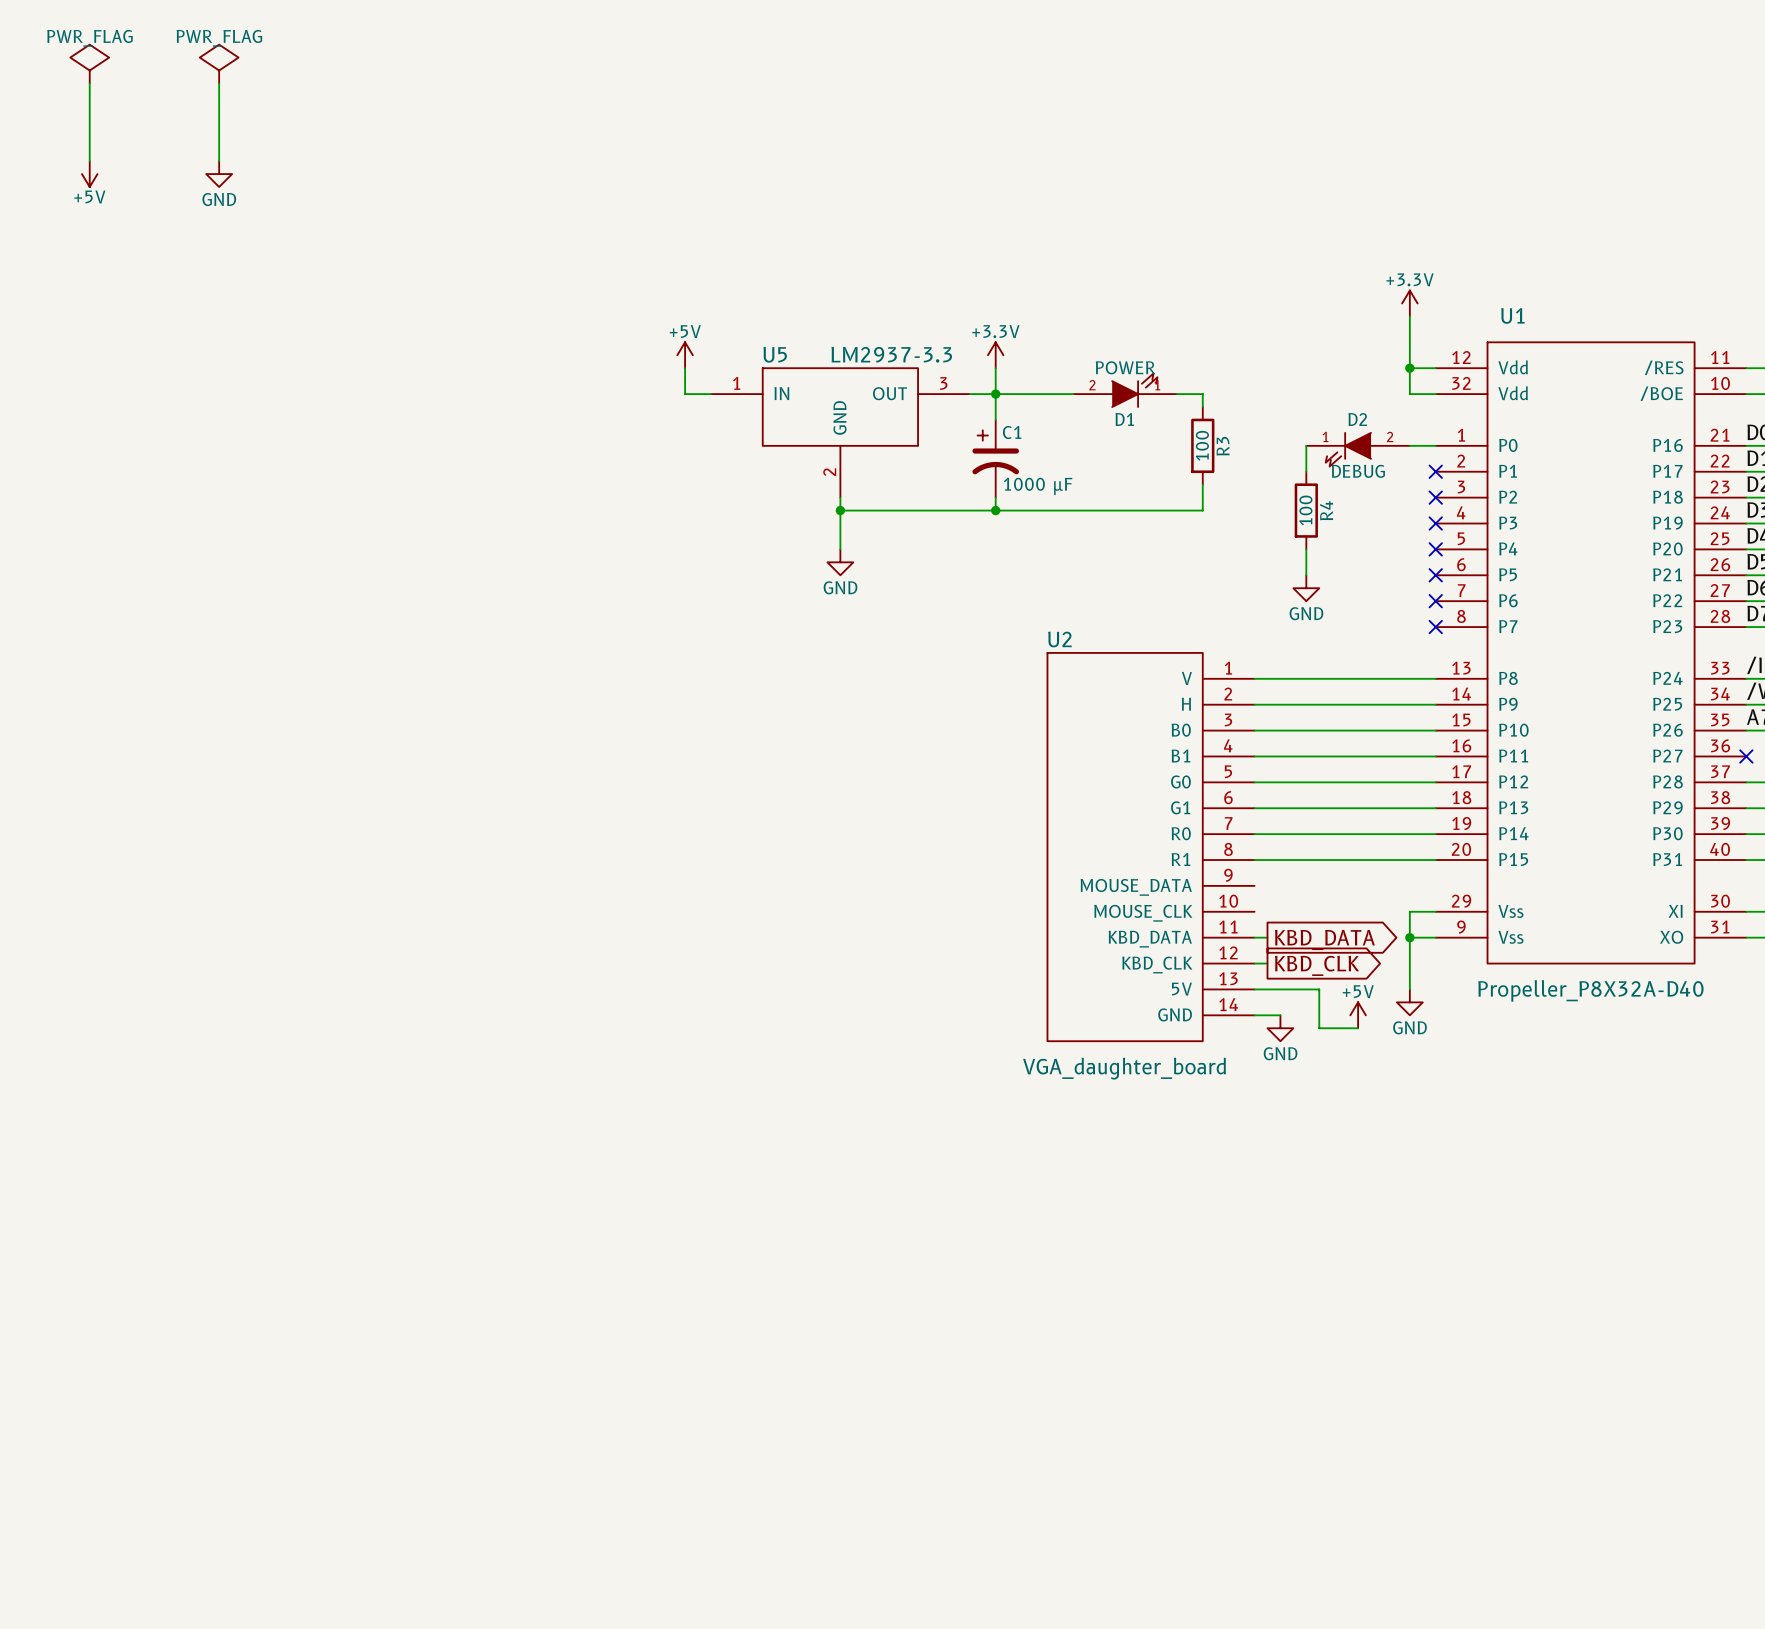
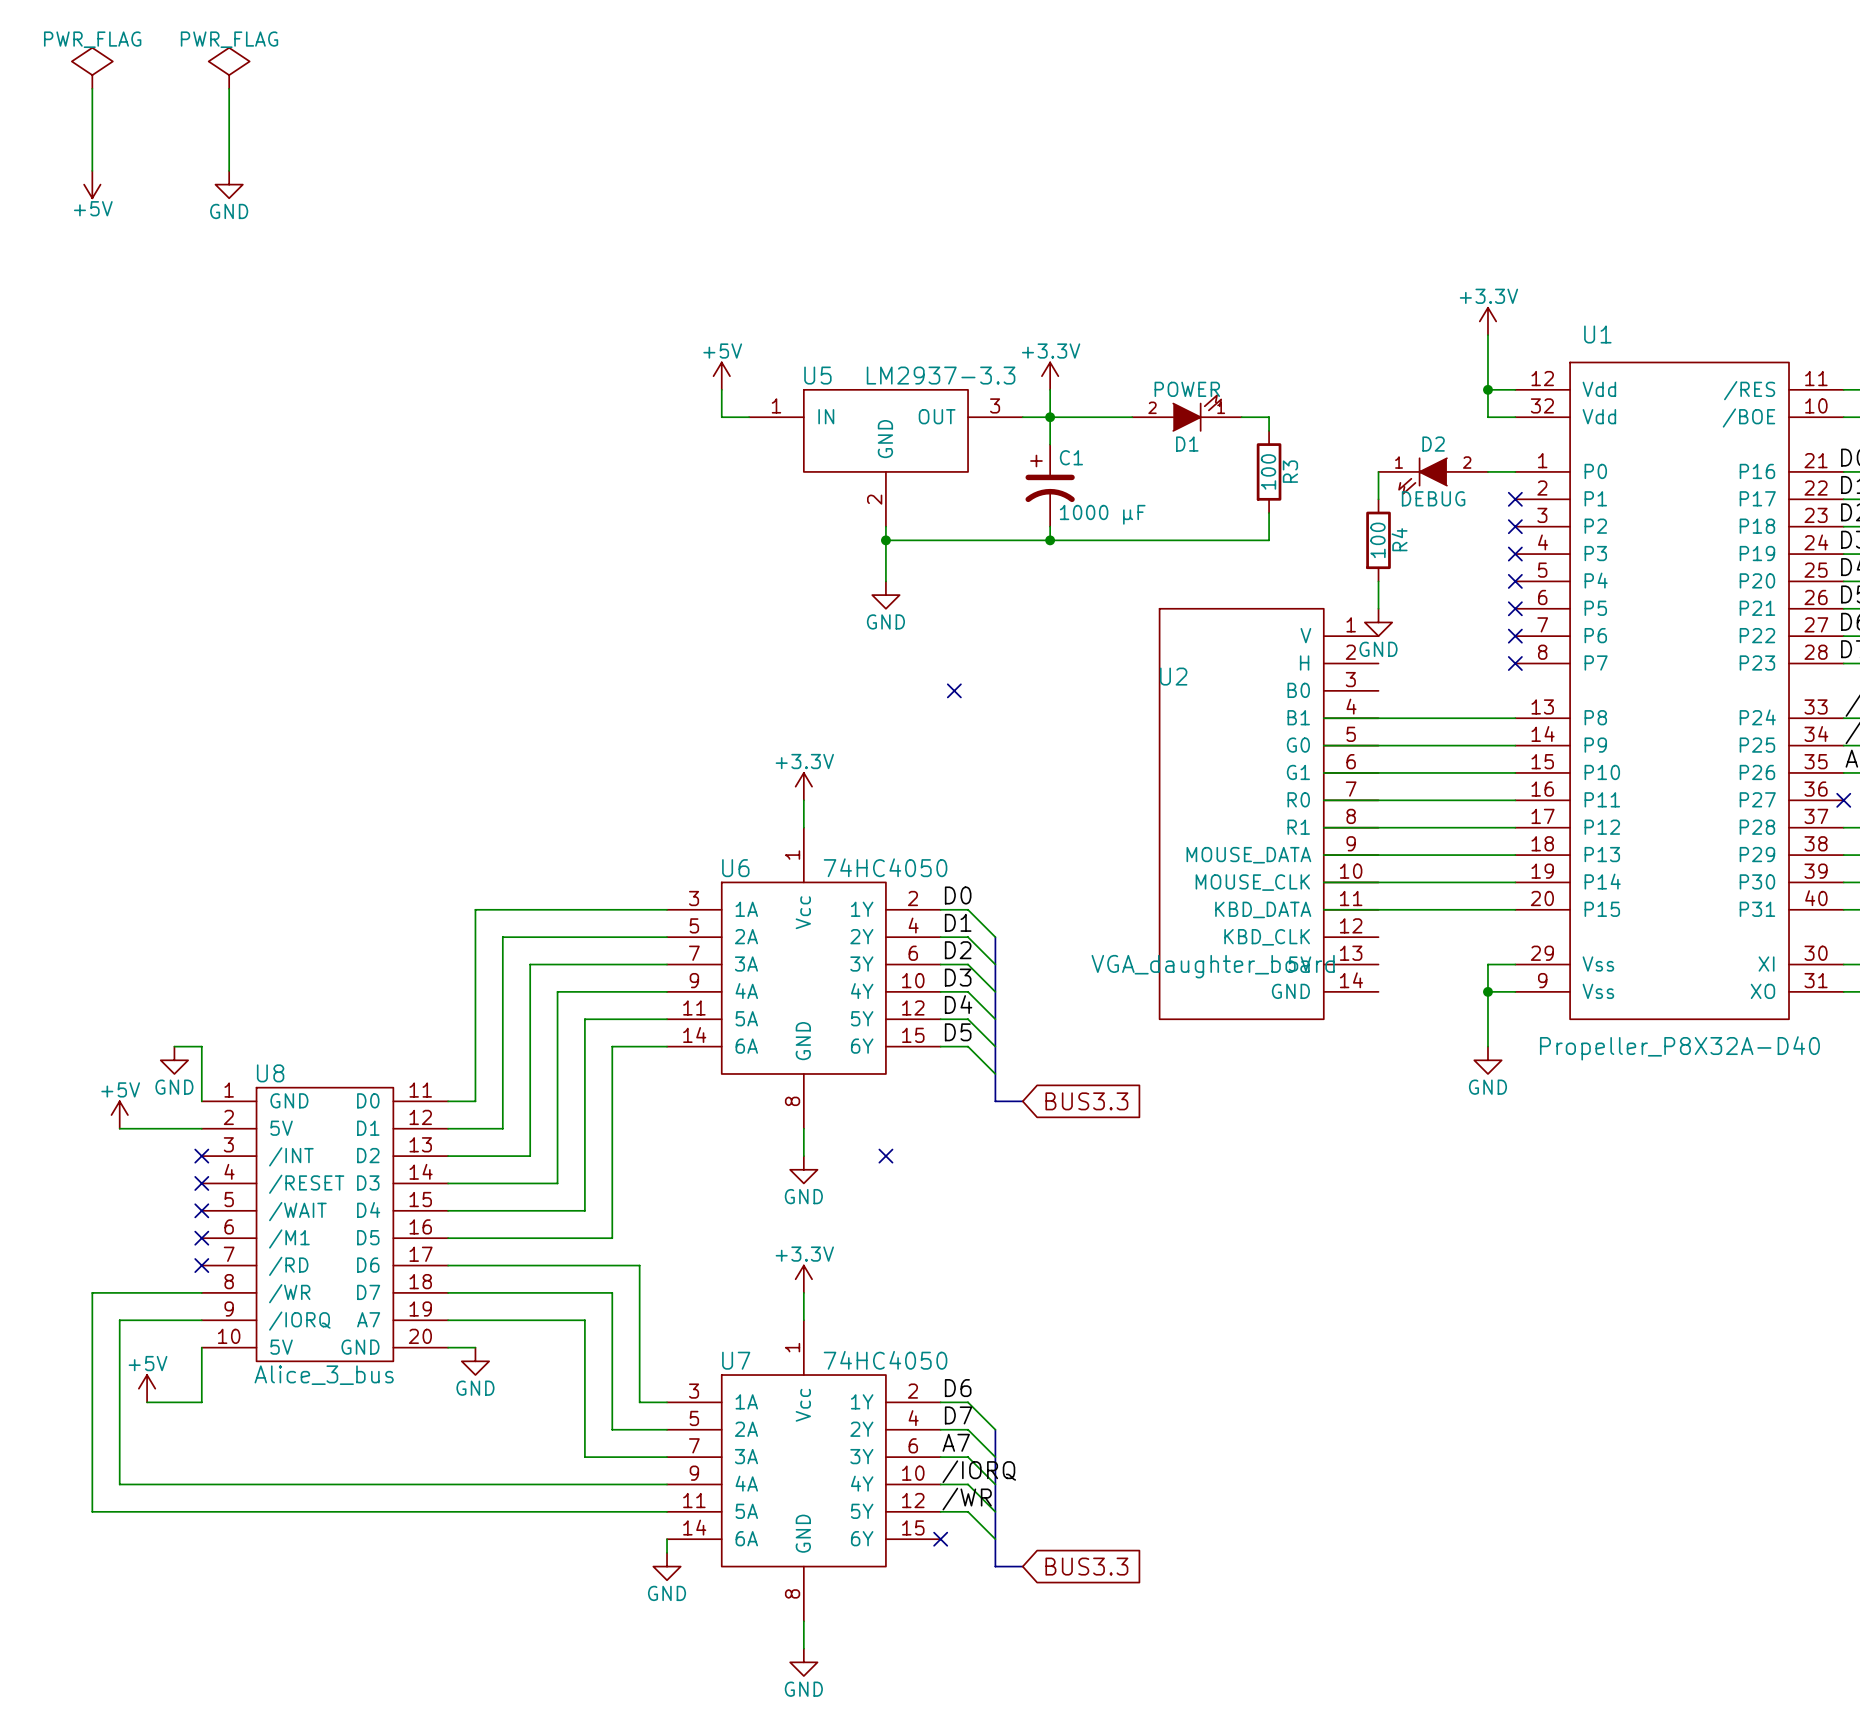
U2 name position: U2 (1059, 639) -> U2 (1173, 676)
no-connect mark: none -> (954, 690)
power symbol: none -> +3.3V (803, 786)
wire: none -> (803, 800) (803, 827)
label: none -> D0 (958, 895)
U2 position: (1151, 847) -> (1269, 814)
wire: none -> (667, 909) (475, 909) (475, 1101) (448, 1101)
wire: none -> (940, 909) (968, 909) (995, 937)
label: none -> D1 (958, 922)
wire: none -> (667, 937) (502, 937) (502, 1128) (448, 1128)
wire: none -> (940, 937) (968, 937) (995, 964)
bus: none -> (995, 937) (995, 1101) (1022, 1101)
label: none -> D2 (958, 950)
wire: none -> (667, 964) (530, 964) (530, 1156) (448, 1156)
wire: none -> (940, 964) (968, 964) (995, 991)
U6: none -> 74HC4050 (803, 978)
label: none -> D3 (958, 977)
wire: none -> (667, 991) (557, 991) (557, 1183) (448, 1183)
wire: none -> (940, 991) (968, 991) (995, 1019)
global label: KBD_DATA (1324, 939) -> none
label: none -> D4 (958, 1004)
wire: none -> (667, 1019) (584, 1019) (584, 1210) (448, 1210)
wire: none -> (940, 1019) (968, 1019) (995, 1046)
wire: (1254, 963) (1267, 963) -> none
global label: KBD_CLK (1317, 965) -> none
label: none -> D5 (958, 1032)
wire: none -> (174, 1046) (201, 1046) (201, 1101)
wire: none -> (667, 1046) (612, 1046) (612, 1238) (448, 1238)
wire: none -> (940, 1046) (968, 1046) (995, 1073)
wire: (1254, 989) (1319, 989) (1319, 1028) (1358, 1028) -> none
power symbol: none -> GND (174, 1060)
wire: (1254, 1015) (1280, 1015) -> none
power symbol: +5V (1358, 1015) -> none
power symbol: GND (1280, 1028) -> none
global label: none -> BUS3.3 (1086, 1101)
power symbol: none -> +5V (119, 1115)
wire: none -> (119, 1128) (201, 1128)
wire: none -> (803, 1128) (803, 1156)
U2 value position: VGA_daughter_board (1124, 1068) -> VGA_daughter_board (1213, 966)
no-connect mark: none -> (201, 1156)
no-connect mark: none -> (885, 1156)
power symbol: none -> GND (803, 1169)
no-connect mark: none -> (201, 1183)
no-connect mark: none -> (201, 1210)
U8: none -> Alice_3_bus (324, 1224)
no-connect mark: none -> (201, 1238)
no-connect mark: none -> (201, 1265)
wire: none -> (448, 1265) (639, 1265) (639, 1402) (667, 1402)
power symbol: none -> +3.3V (803, 1279)
wire: none -> (201, 1292) (92, 1292) (92, 1511) (667, 1511)
wire: none -> (448, 1292) (612, 1292) (612, 1429) (667, 1429)
wire: none -> (803, 1292) (803, 1320)
wire: none -> (201, 1320) (119, 1320) (119, 1484) (667, 1484)
wire: none -> (448, 1320) (584, 1320) (584, 1457) (667, 1457)
wire: none -> (201, 1347) (201, 1402) (147, 1402)
wire: none -> (448, 1347) (475, 1347)
power symbol: none -> GND (475, 1361)
label: none -> D6 (958, 1388)
power symbol: none -> +5V (147, 1388)
wire: none -> (940, 1402) (968, 1402) (995, 1429)
label: none -> D7 (958, 1415)
wire: none -> (940, 1429) (968, 1429) (995, 1457)
bus: none -> (995, 1429) (995, 1566) (1022, 1566)
label: none -> A7 (956, 1442)
wire: none -> (940, 1457) (968, 1457) (995, 1484)
U7: none -> 74HC4050 (803, 1470)
label: none -> /IORQ (979, 1471)
wire: none -> (940, 1484) (968, 1484) (995, 1511)
label: none -> /WR (967, 1499)
wire: none -> (940, 1511) (968, 1511) (995, 1539)
wire: none -> (667, 1539) (667, 1552)
no-connect mark: none -> (940, 1539)
power symbol: none -> GND (667, 1566)
global label: none -> BUS3.3 (1086, 1566)
wire: none -> (803, 1621) (803, 1648)
power symbol: none -> GND (803, 1662)

